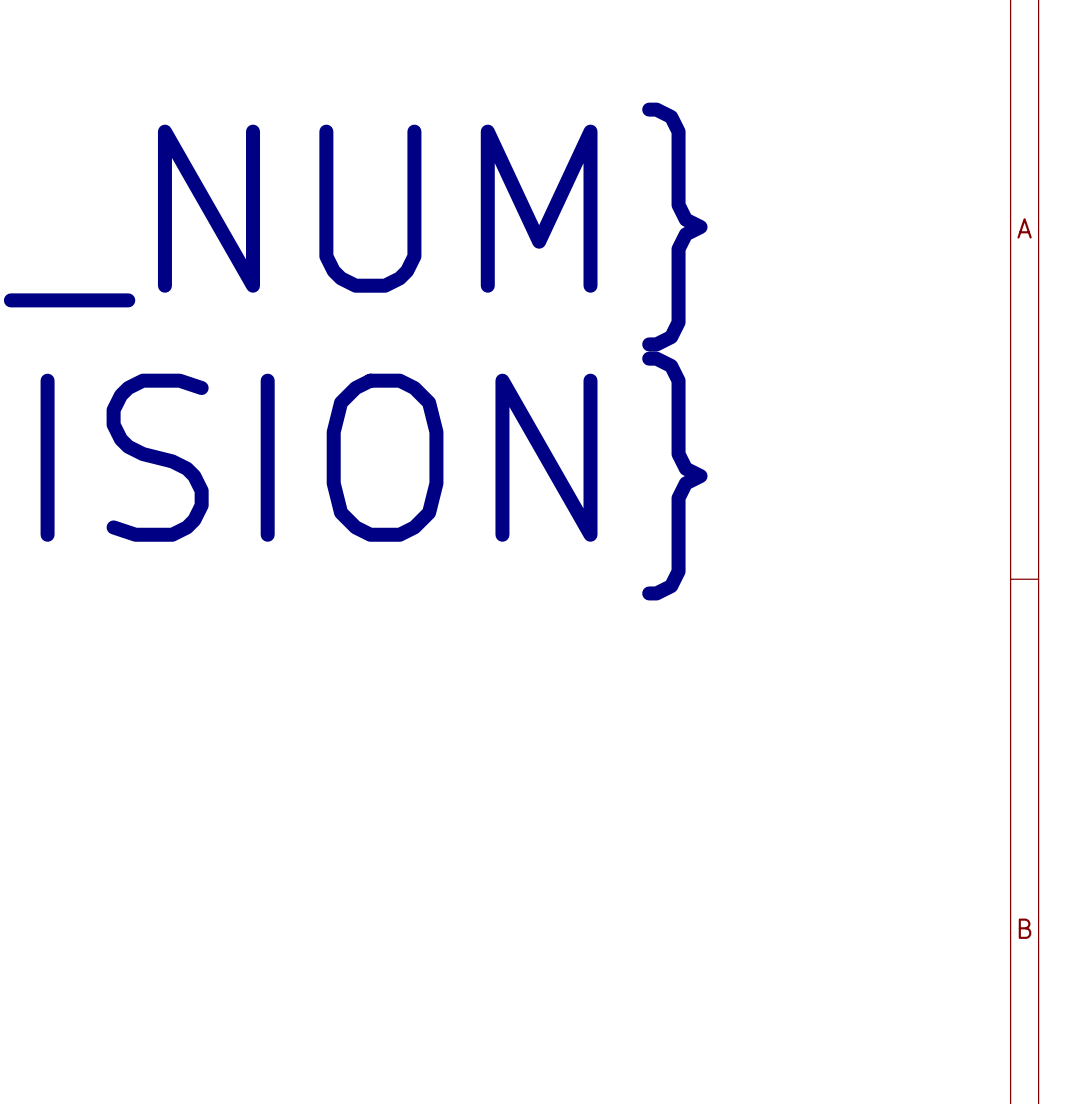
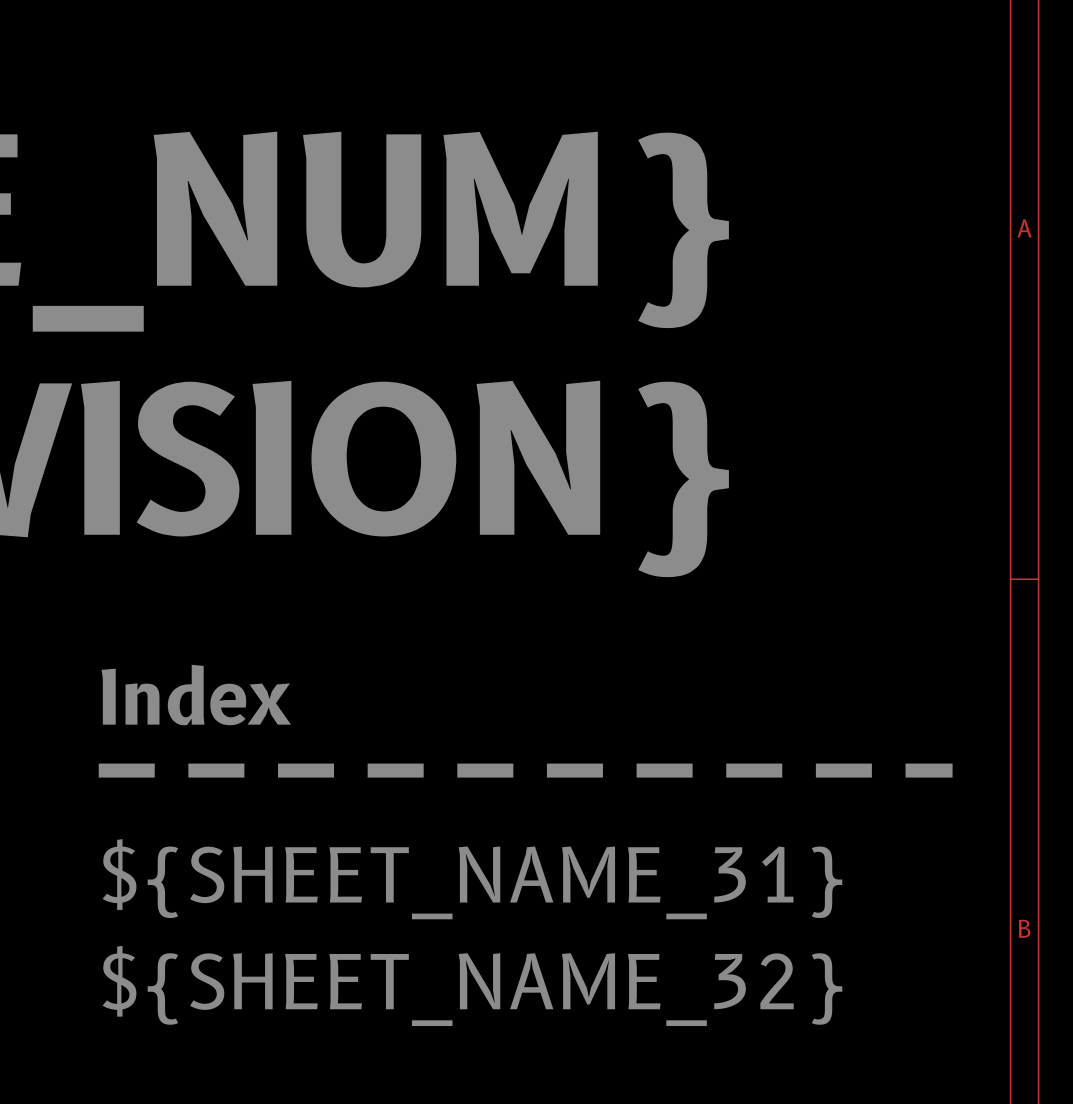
text: none -> Index (196, 695)
line: none -> (98, 770) (952, 770)
text: none -> ${SHEET_NAME_31} (472, 879)
text: none -> ${SHEET_NAME_32} (472, 985)

